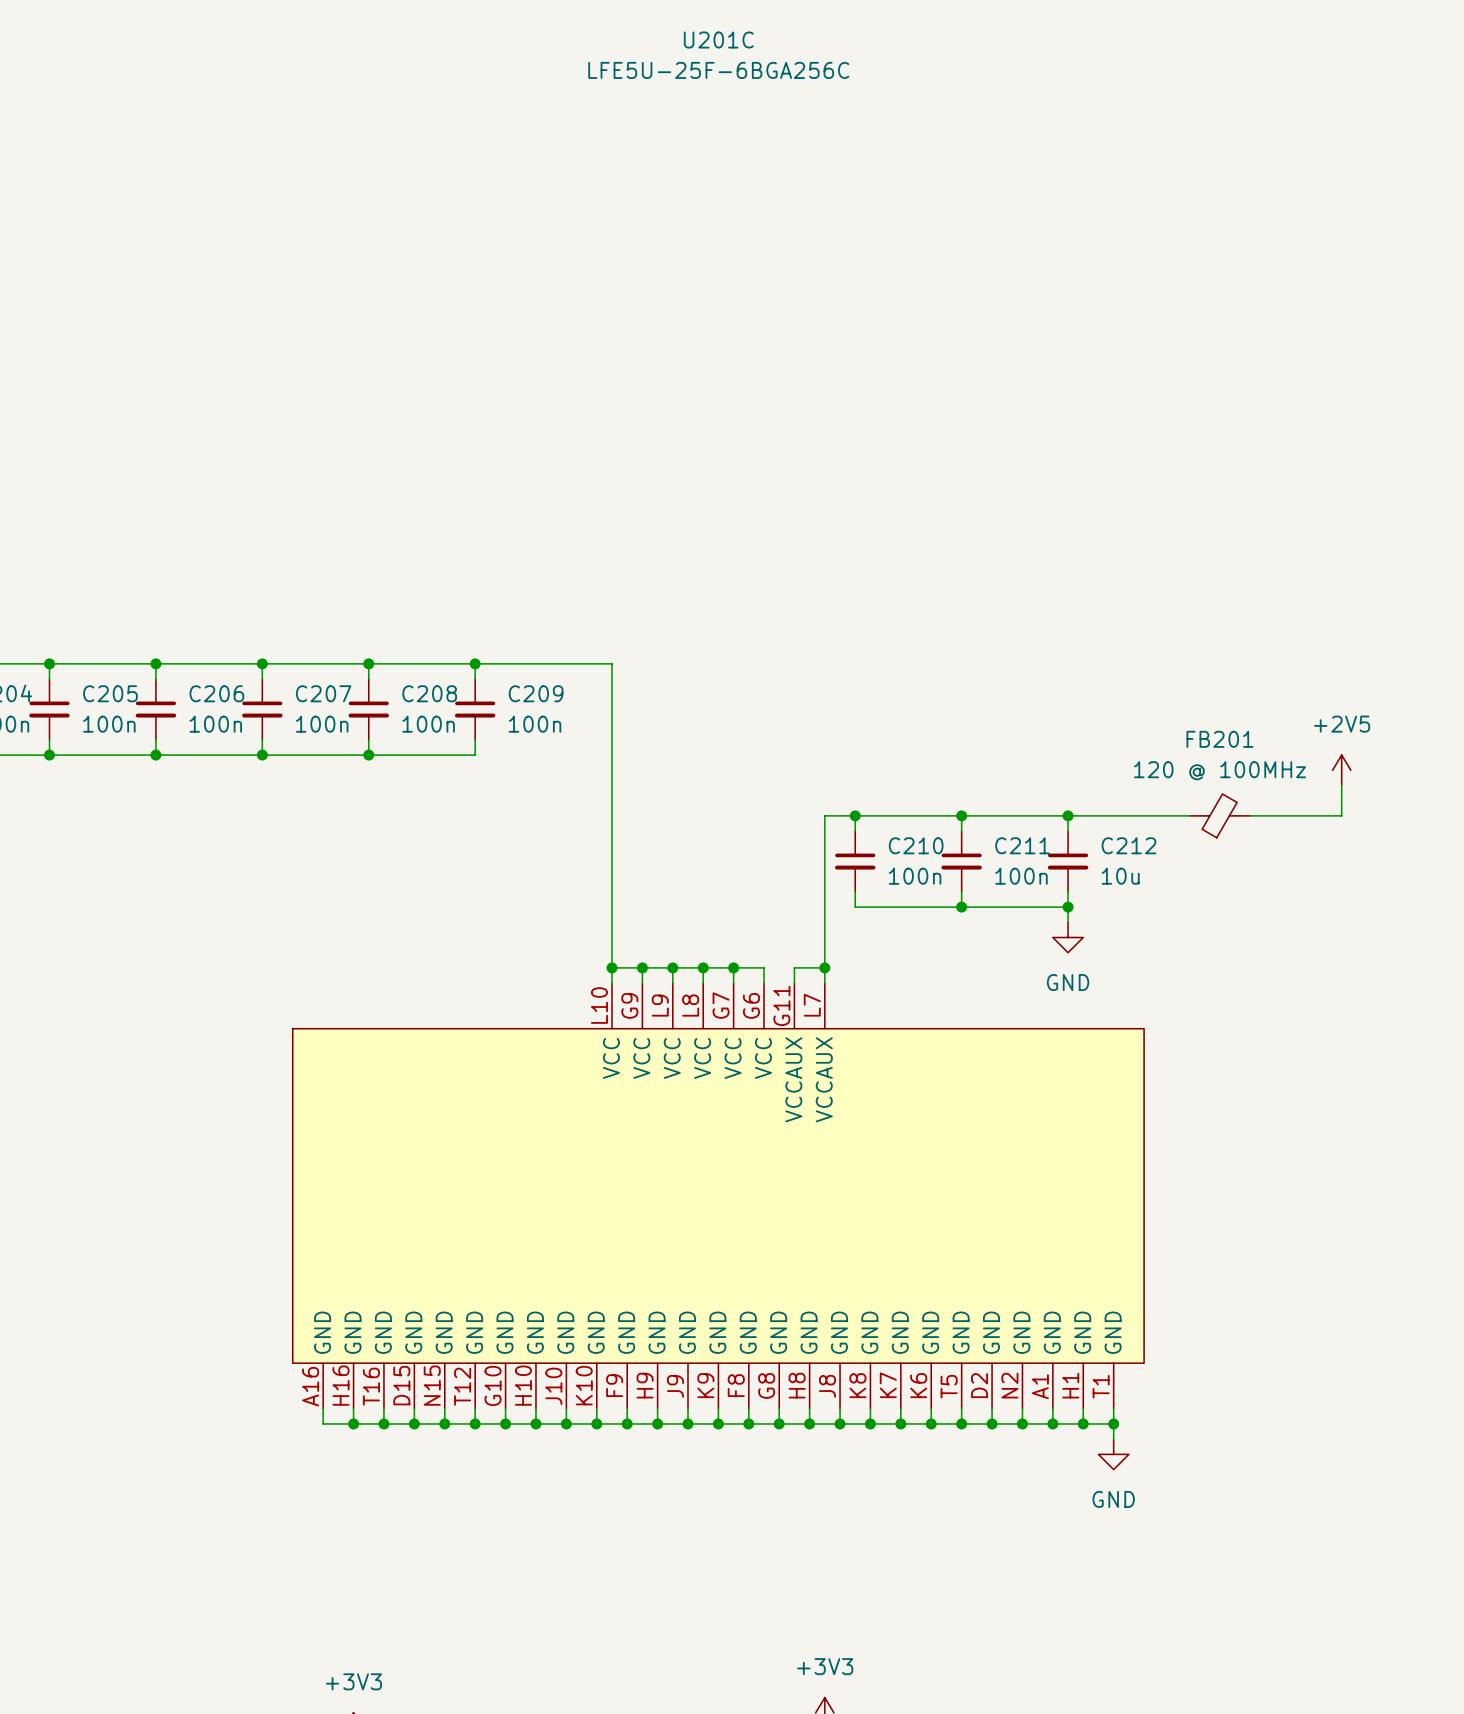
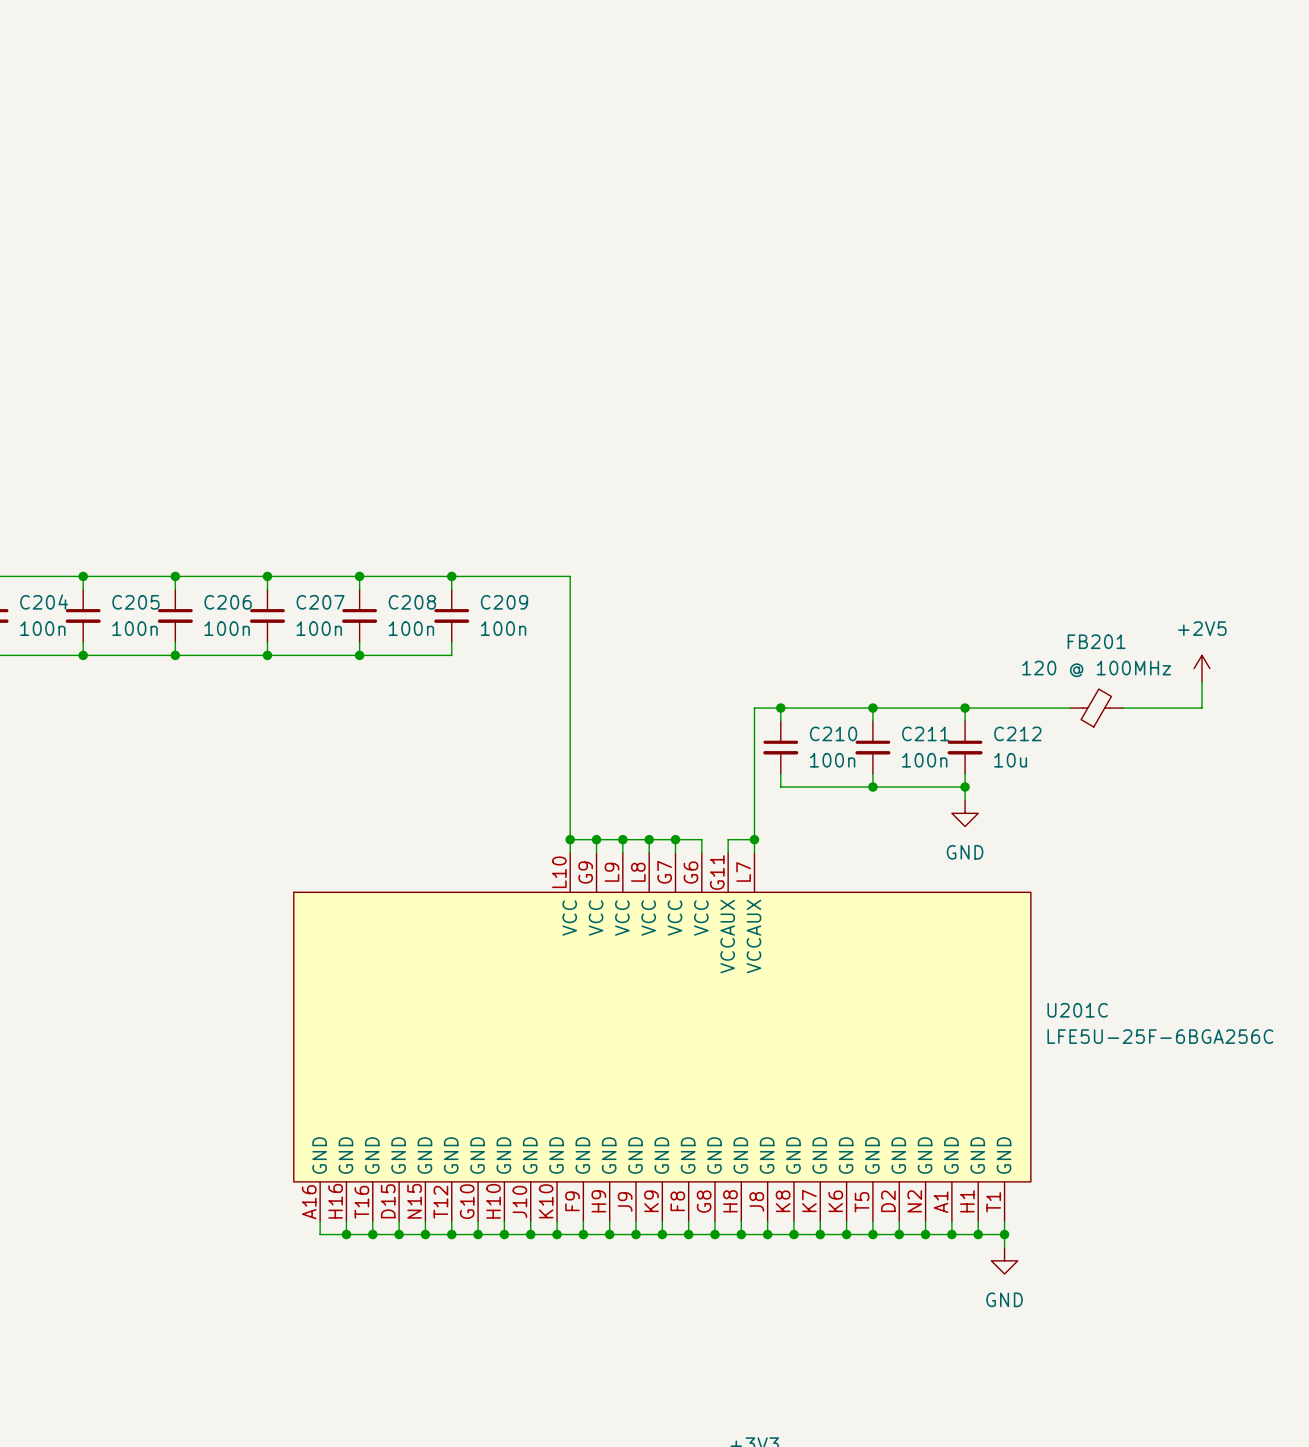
U201C name position: U201C (718, 40) -> U201C (1077, 1010)
U201C value position: LFE5U-25F-6BGA256C (718, 70) -> LFE5U-25F-6BGA256C (1160, 1036)

